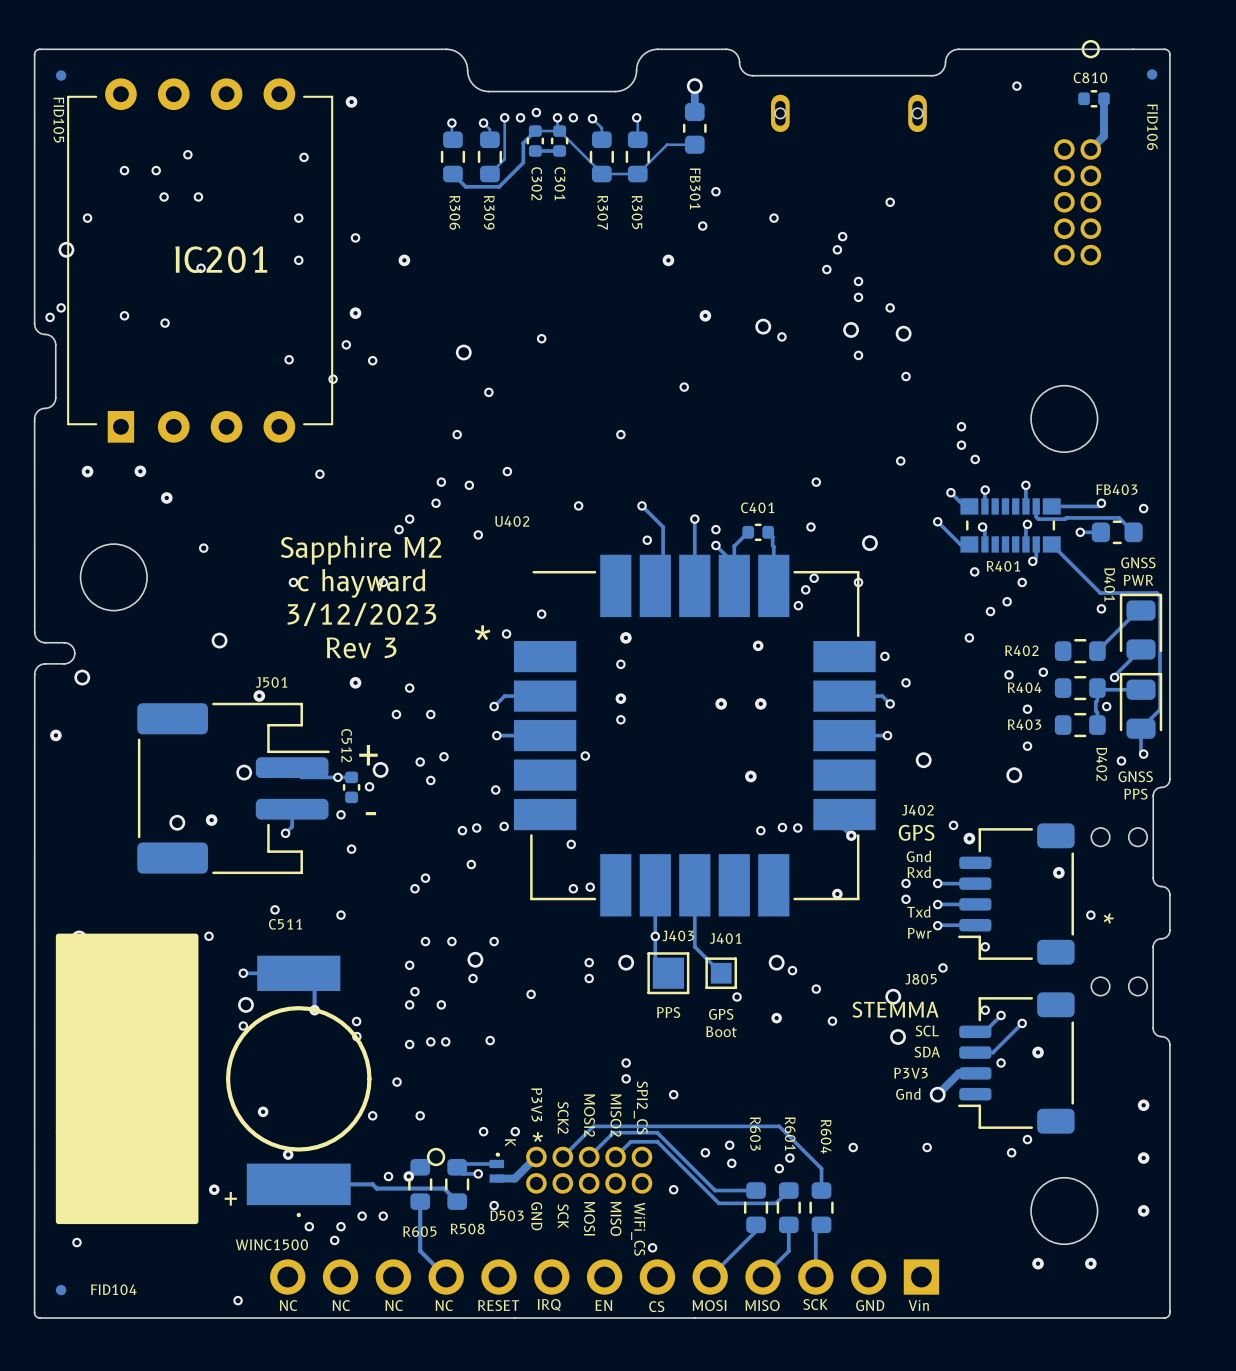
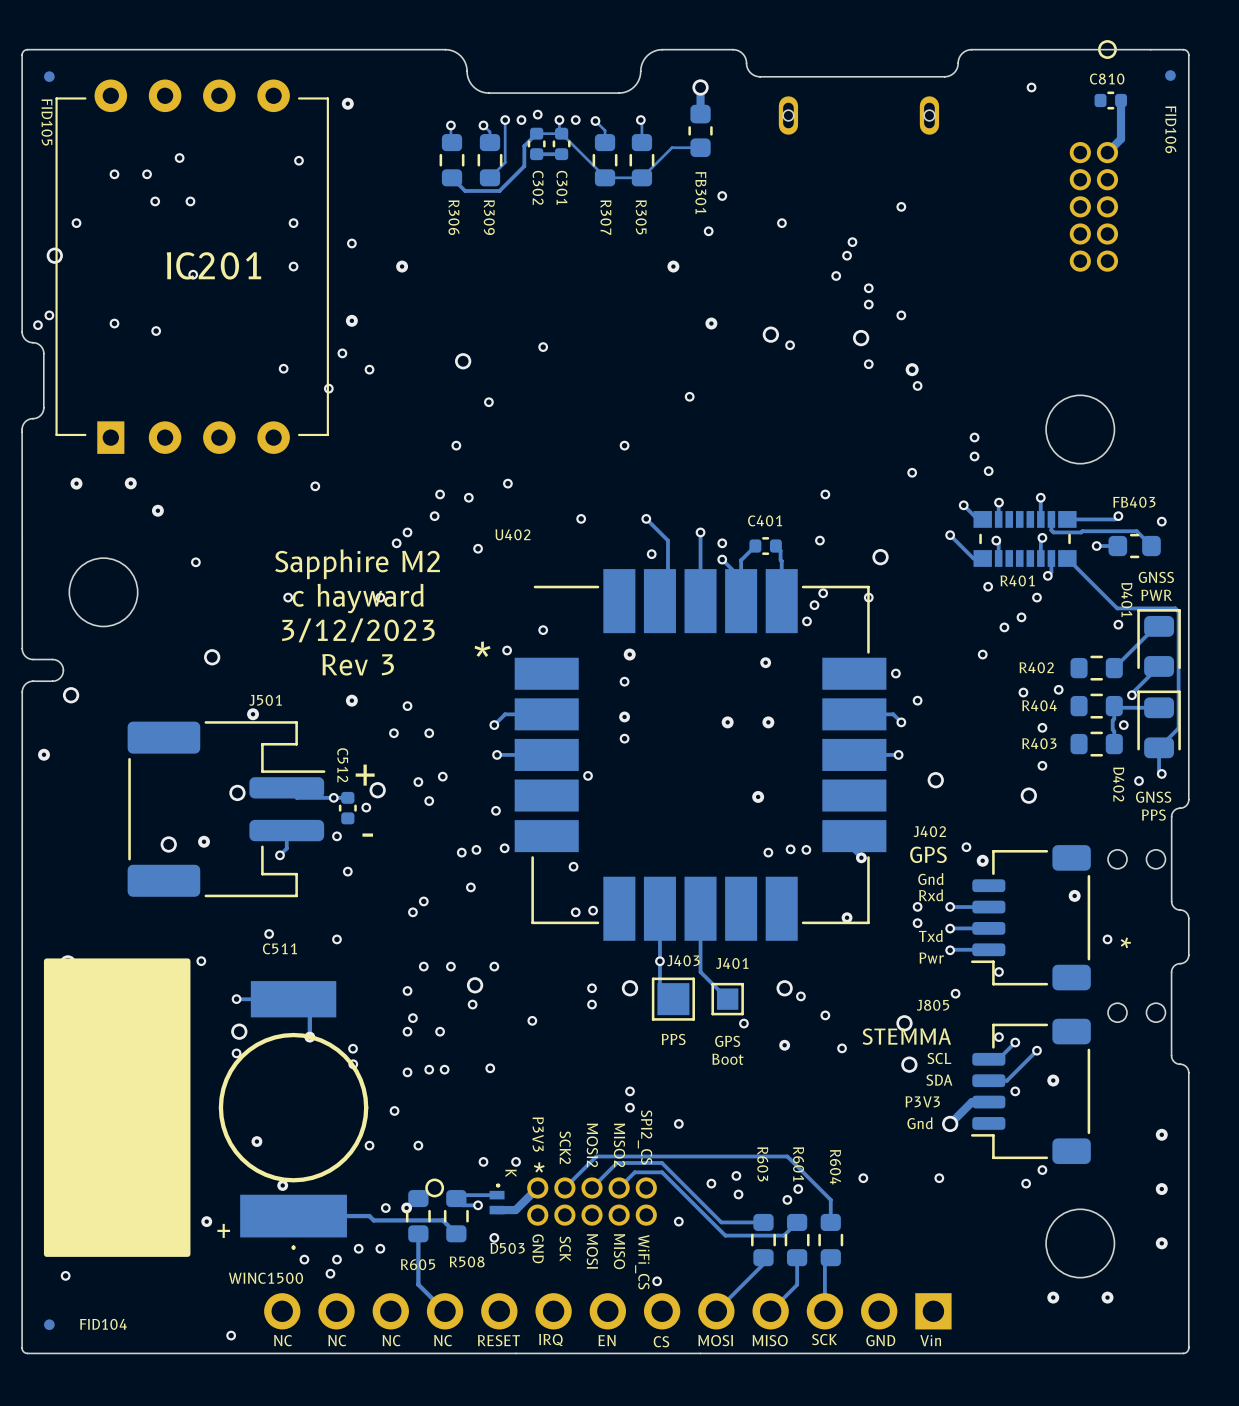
via: (903, 333) -> none
via: none -> (912, 369)

